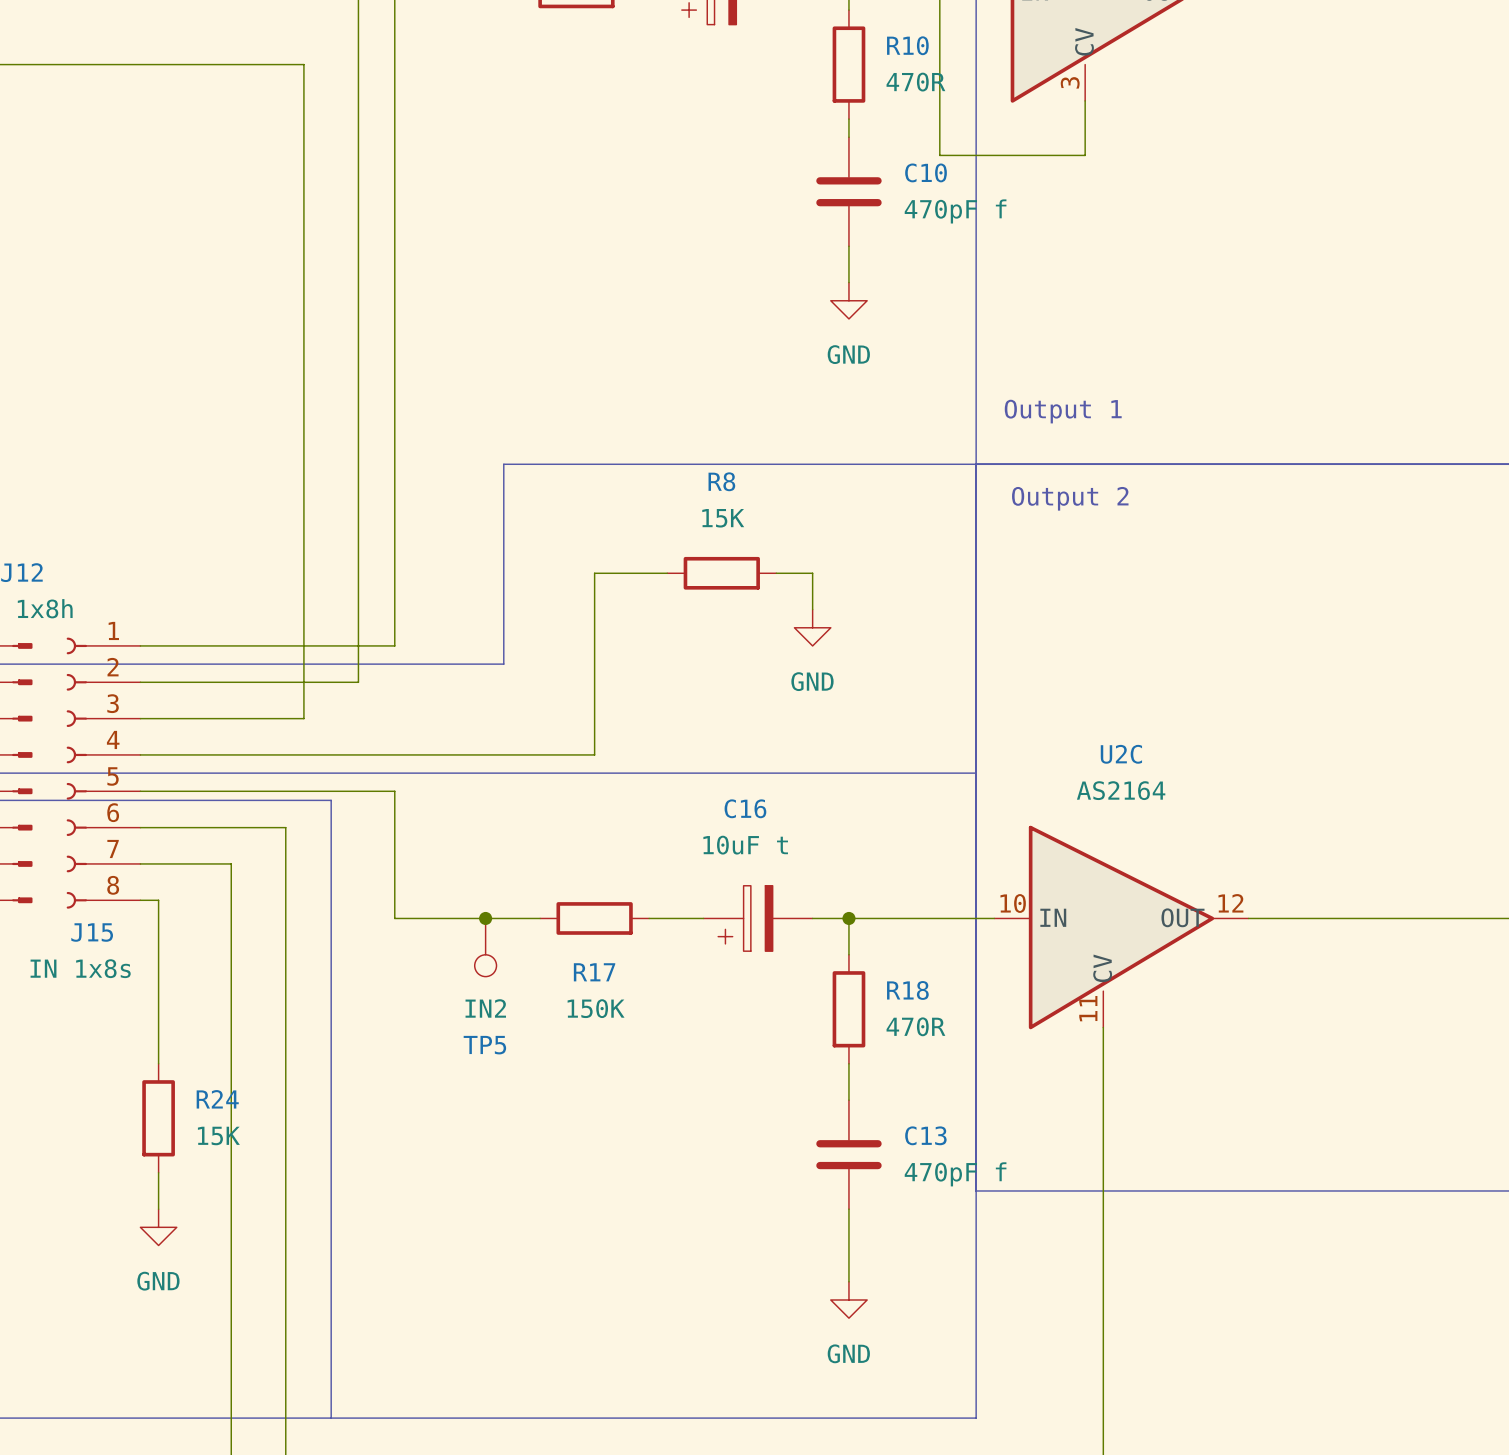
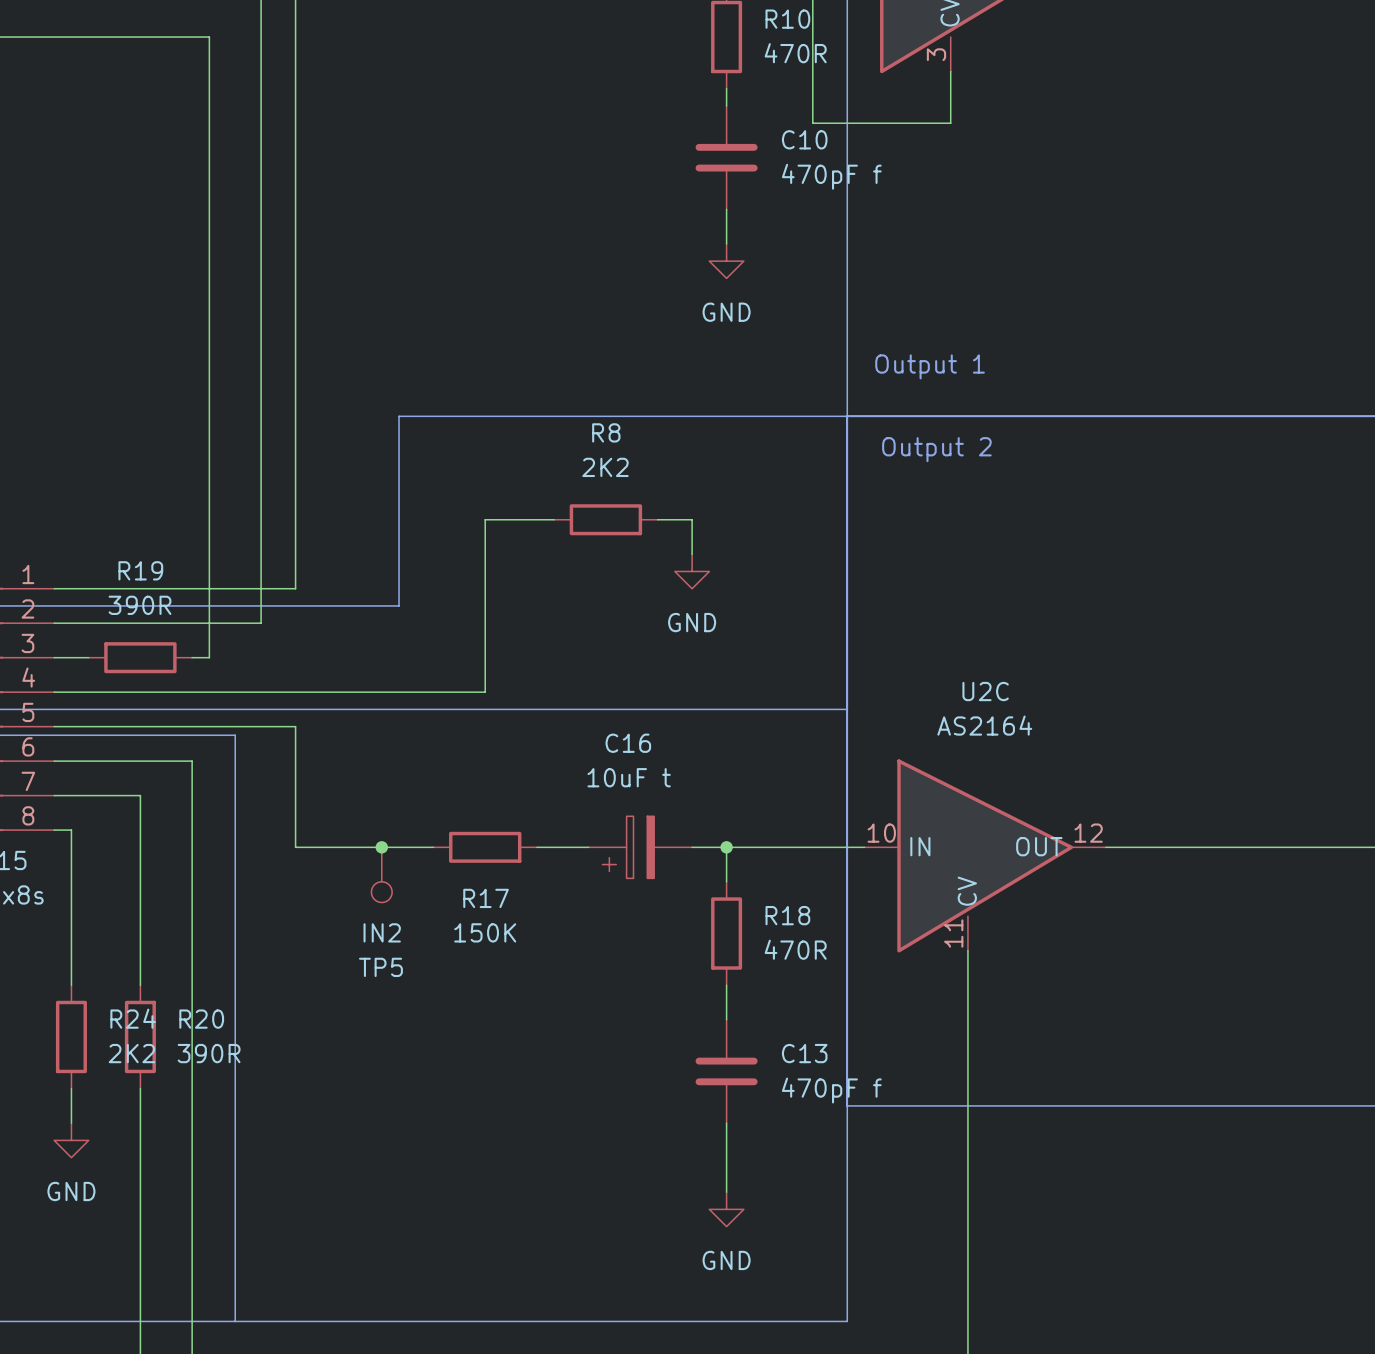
R8 value: 15K (723, 518) -> 2K2 (605, 467)
wire: (176, 718) (285, 718) -> none
R19: none -> 390R (140, 657)
wire: (231, 1063) (231, 1172) -> none
R20: none -> 390R (140, 1036)
R24 value: 15K (218, 1135) -> 2K2 (131, 1053)

